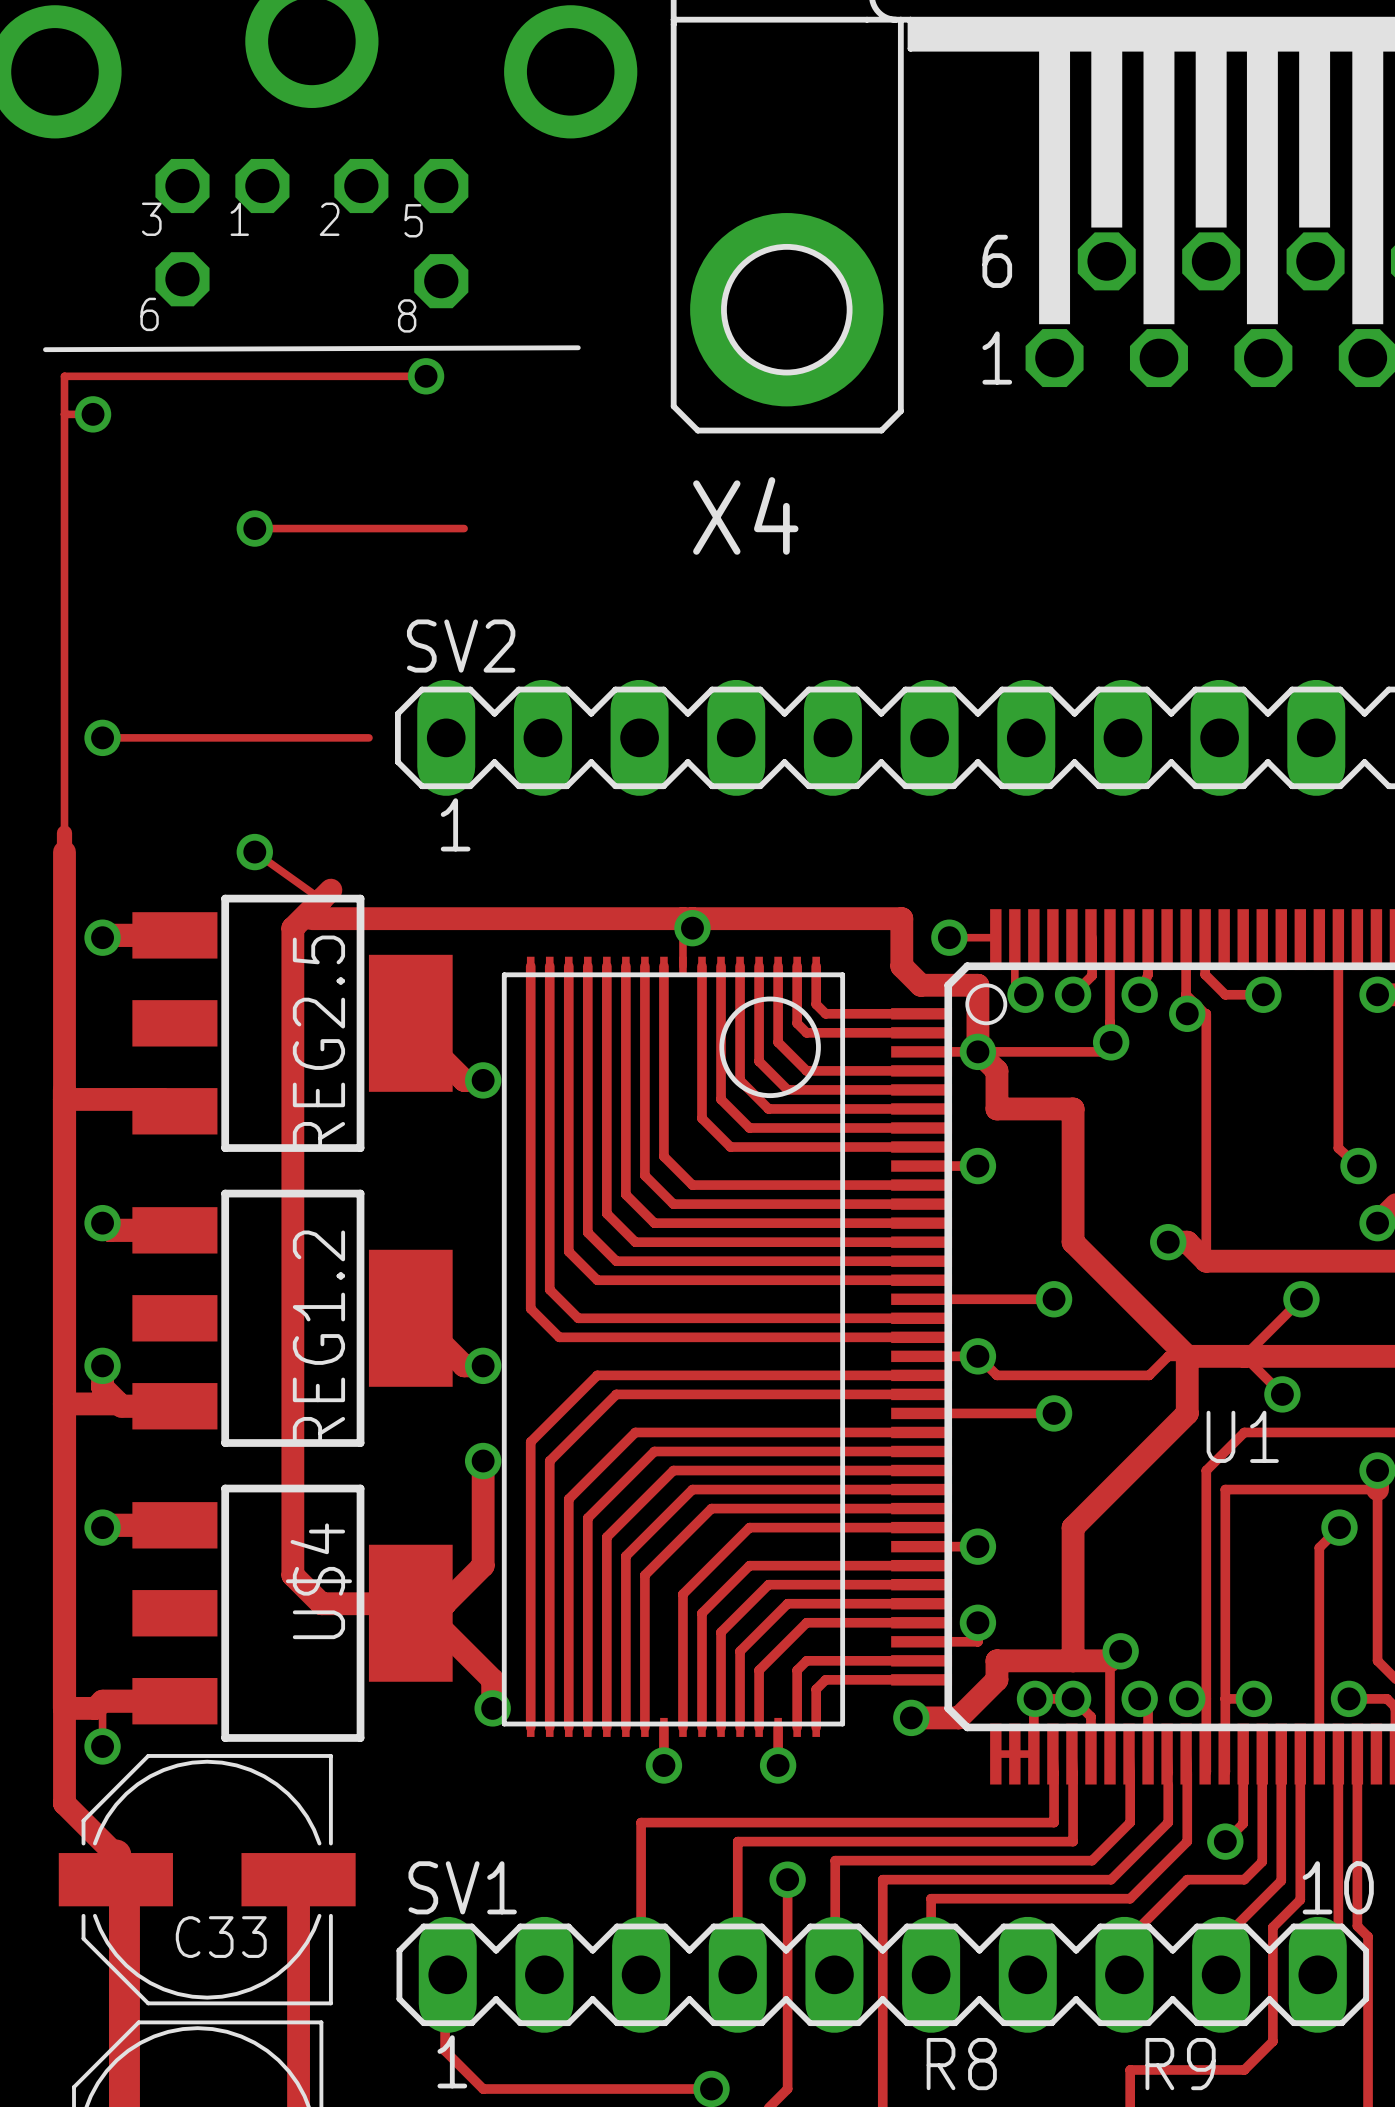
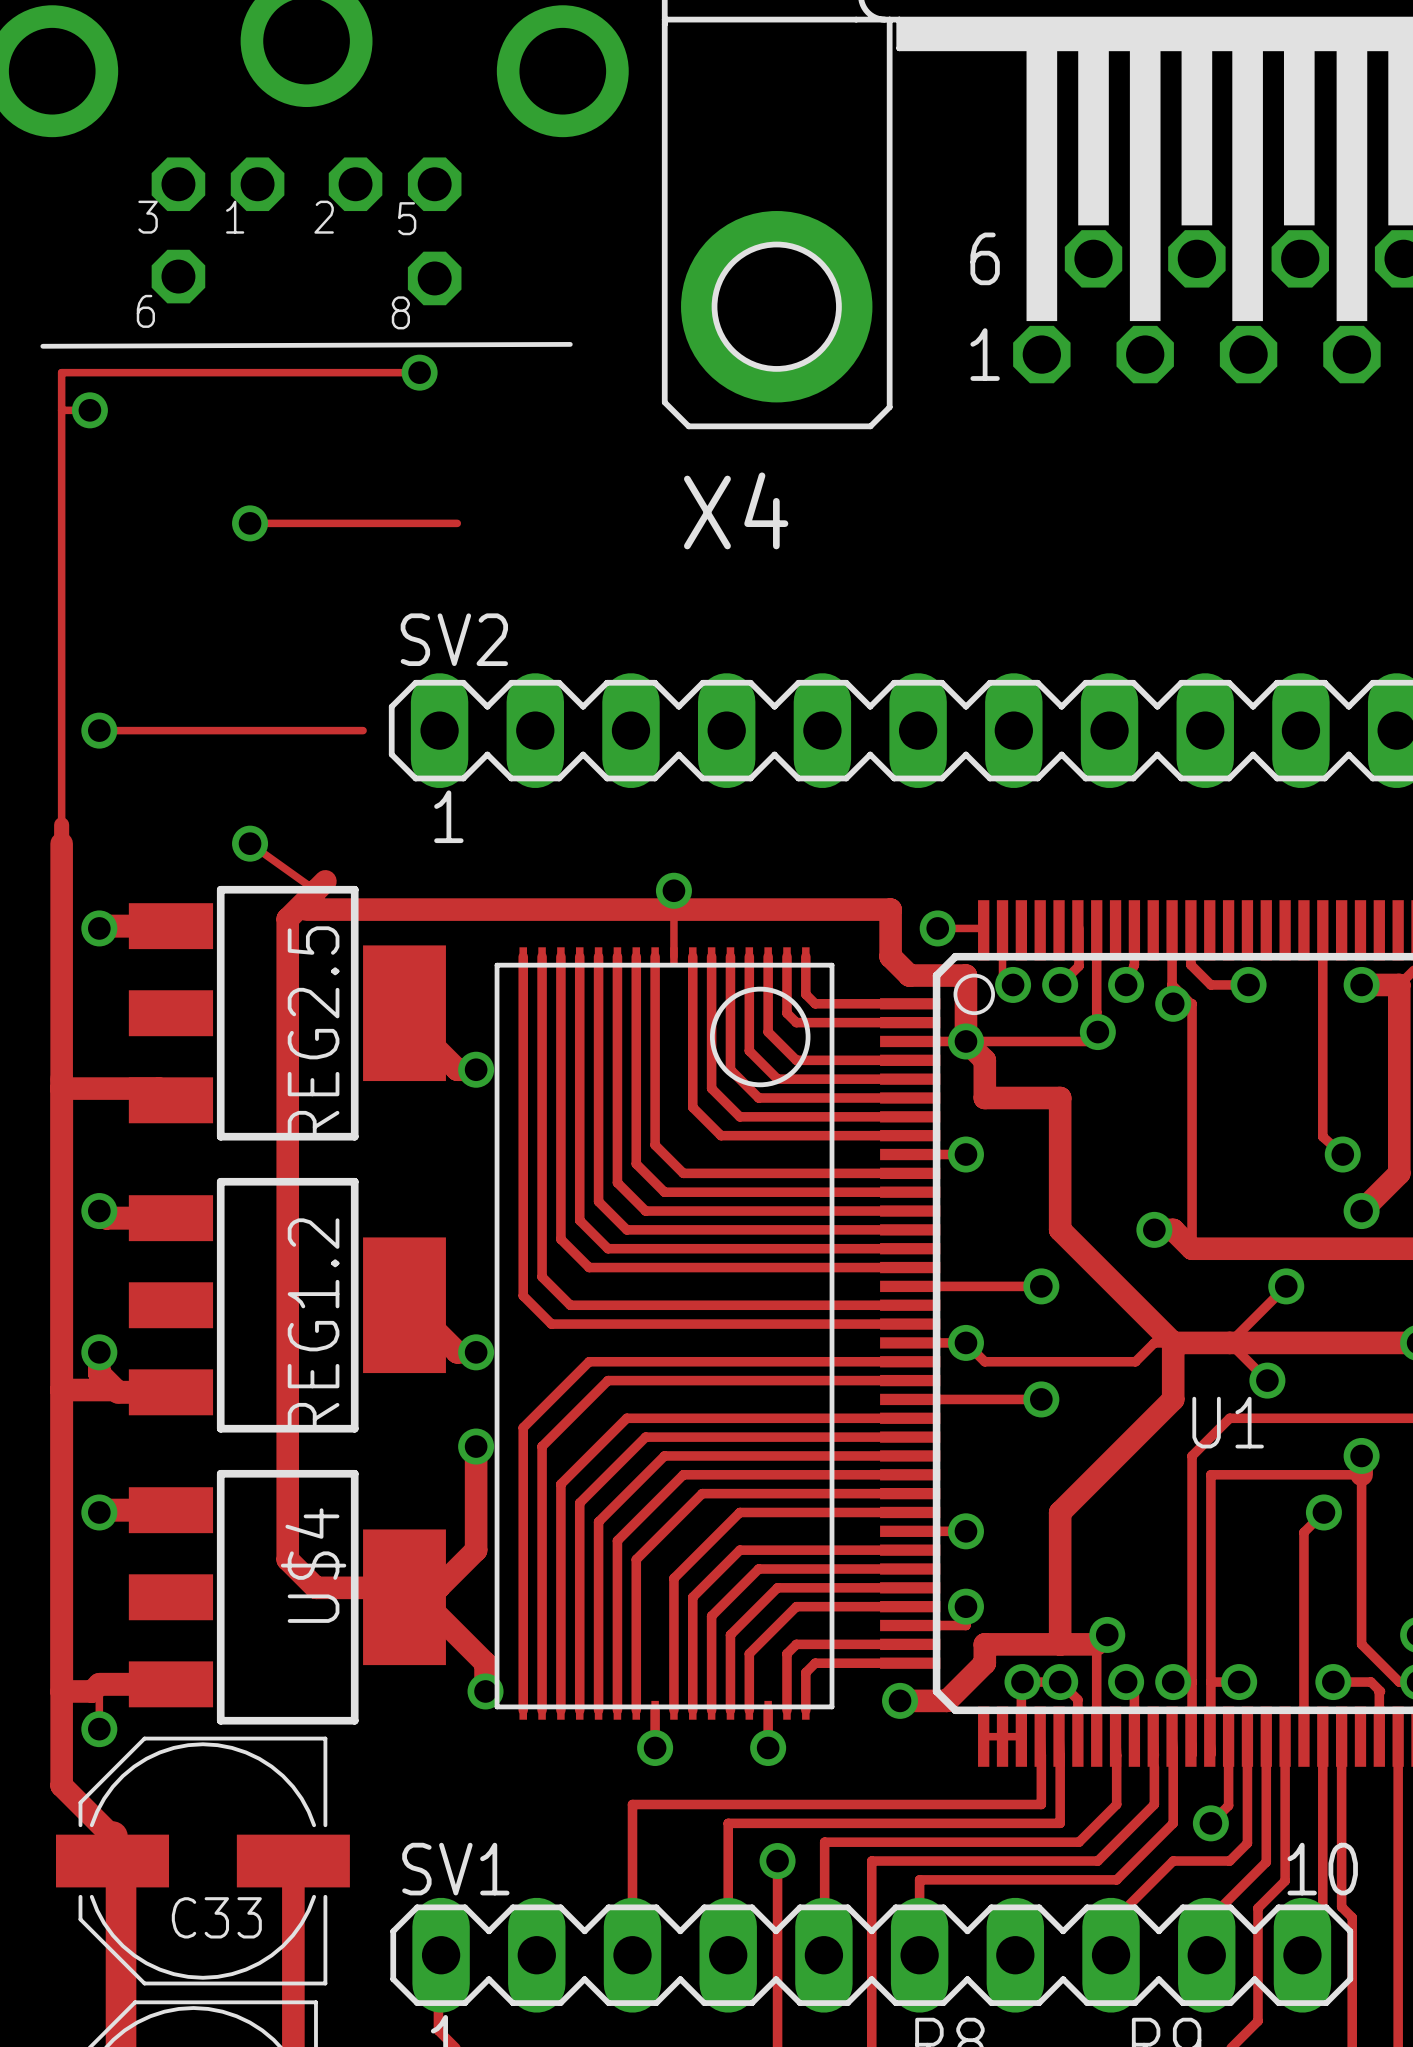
via position: (692, 928) -> (673, 890)

